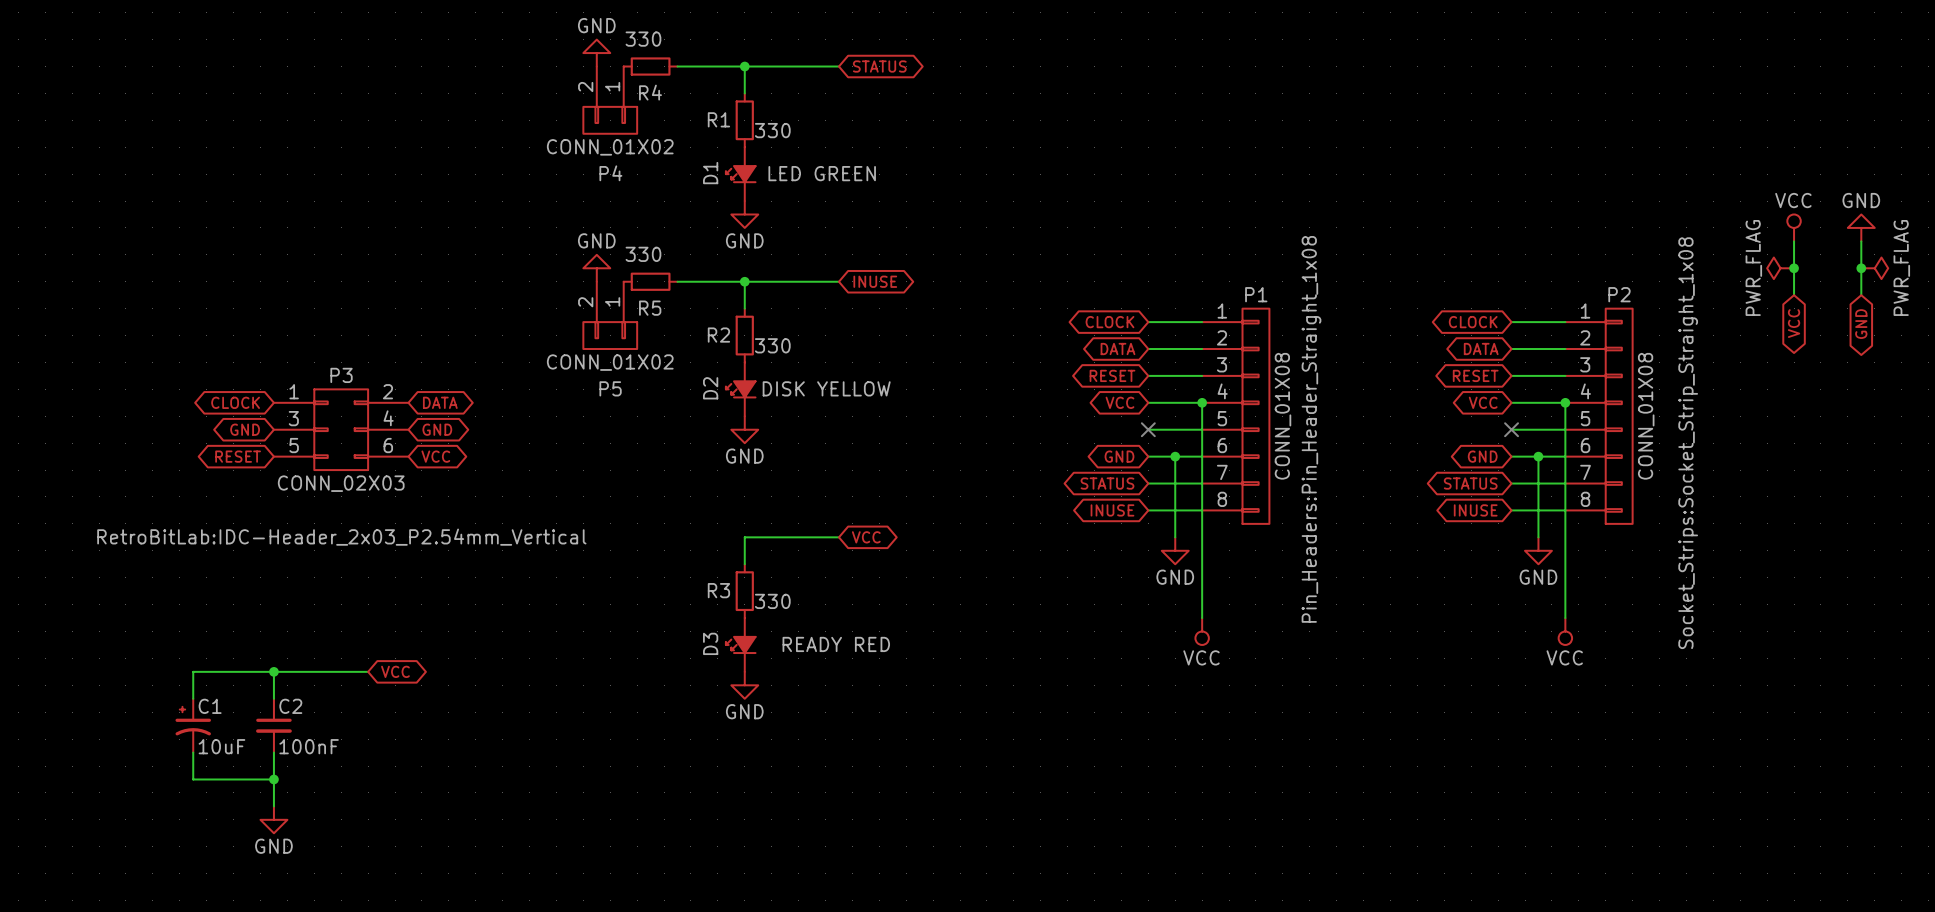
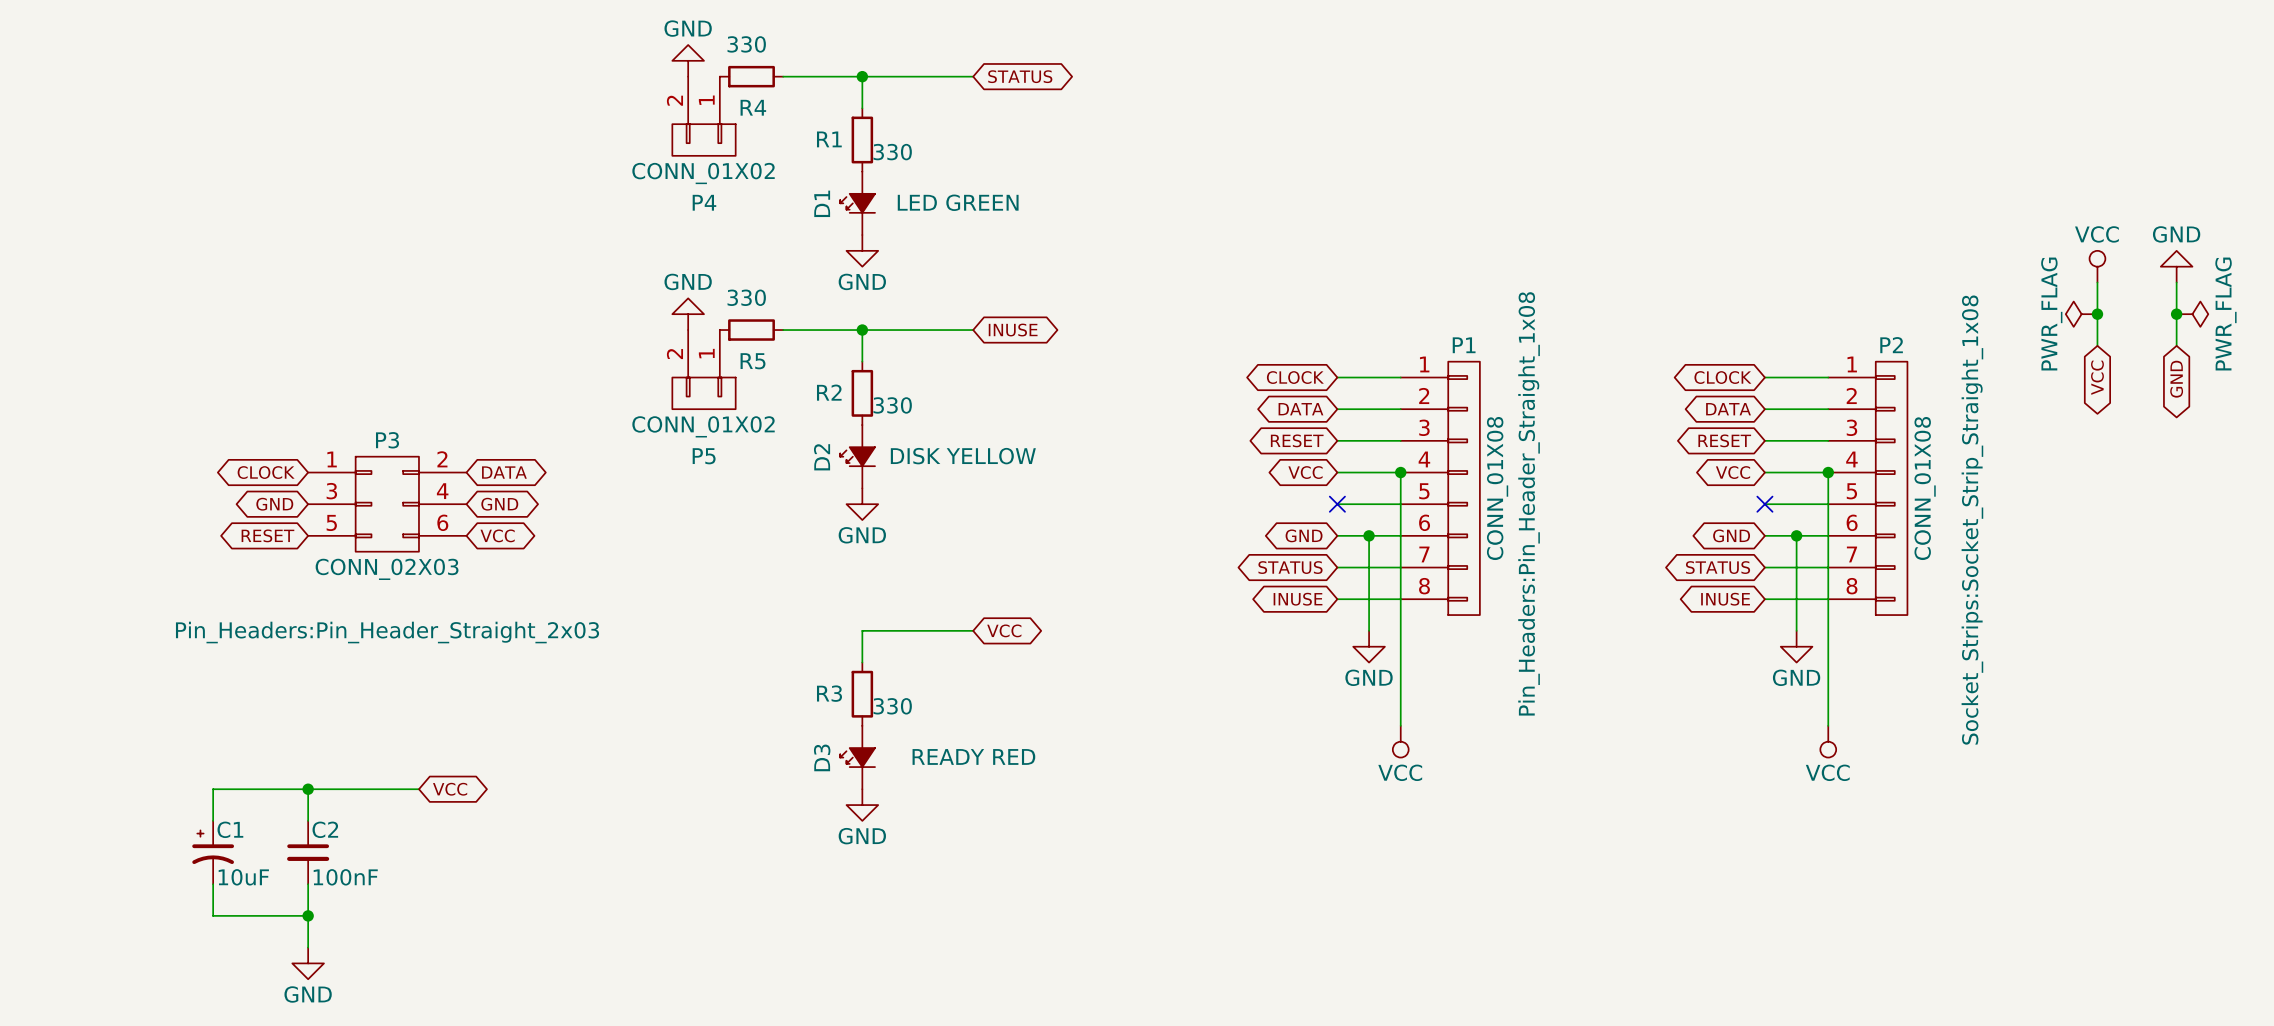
P3 text: RetroBitLab:IDC-Header_2x03_P2.54mm_Vertical (341, 537) -> Pin_Headers:Pin_Header_Straight_2x03 (387, 632)

